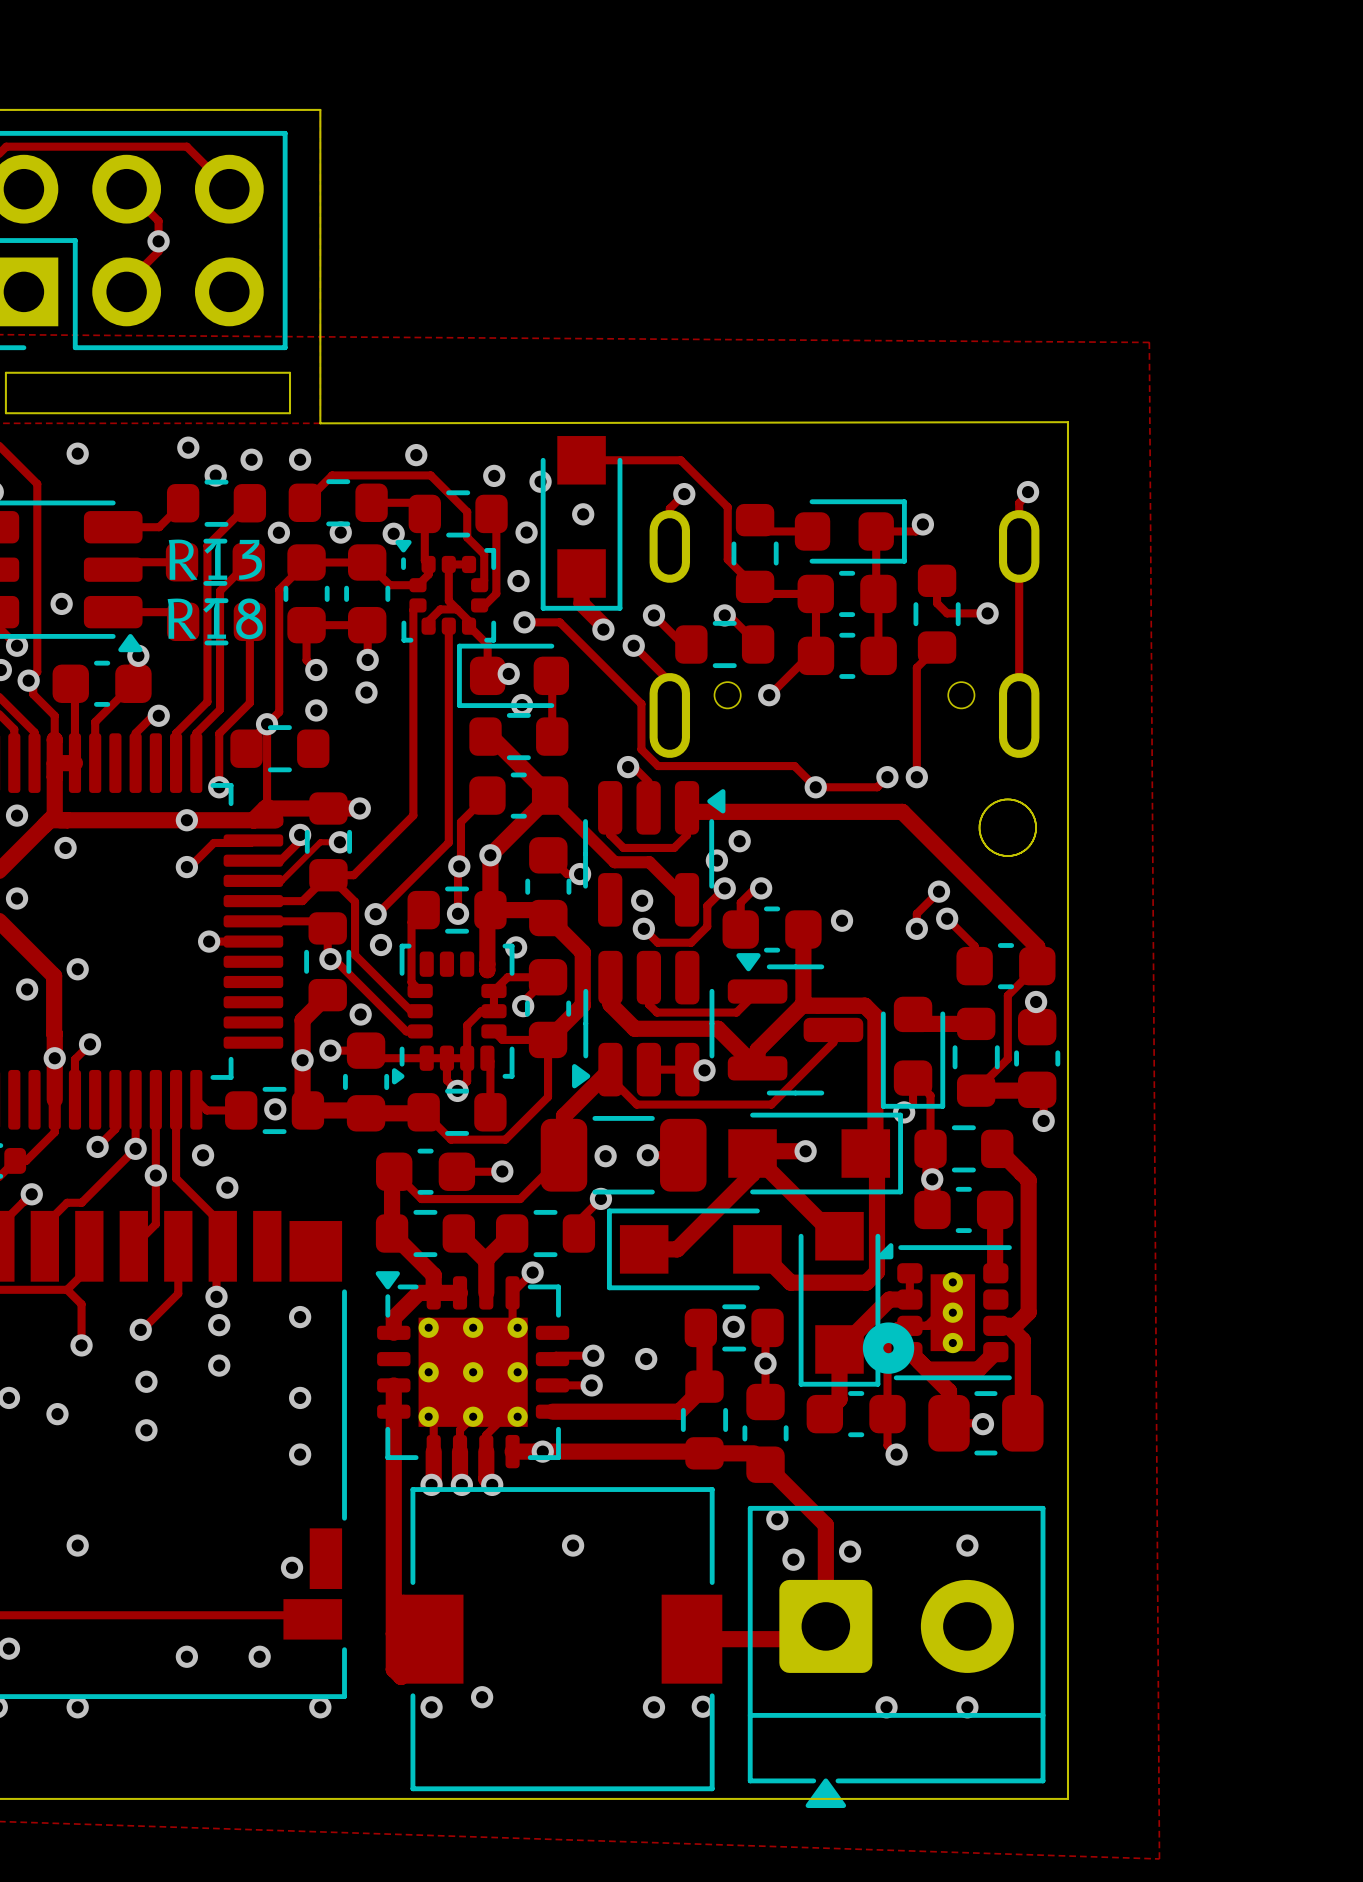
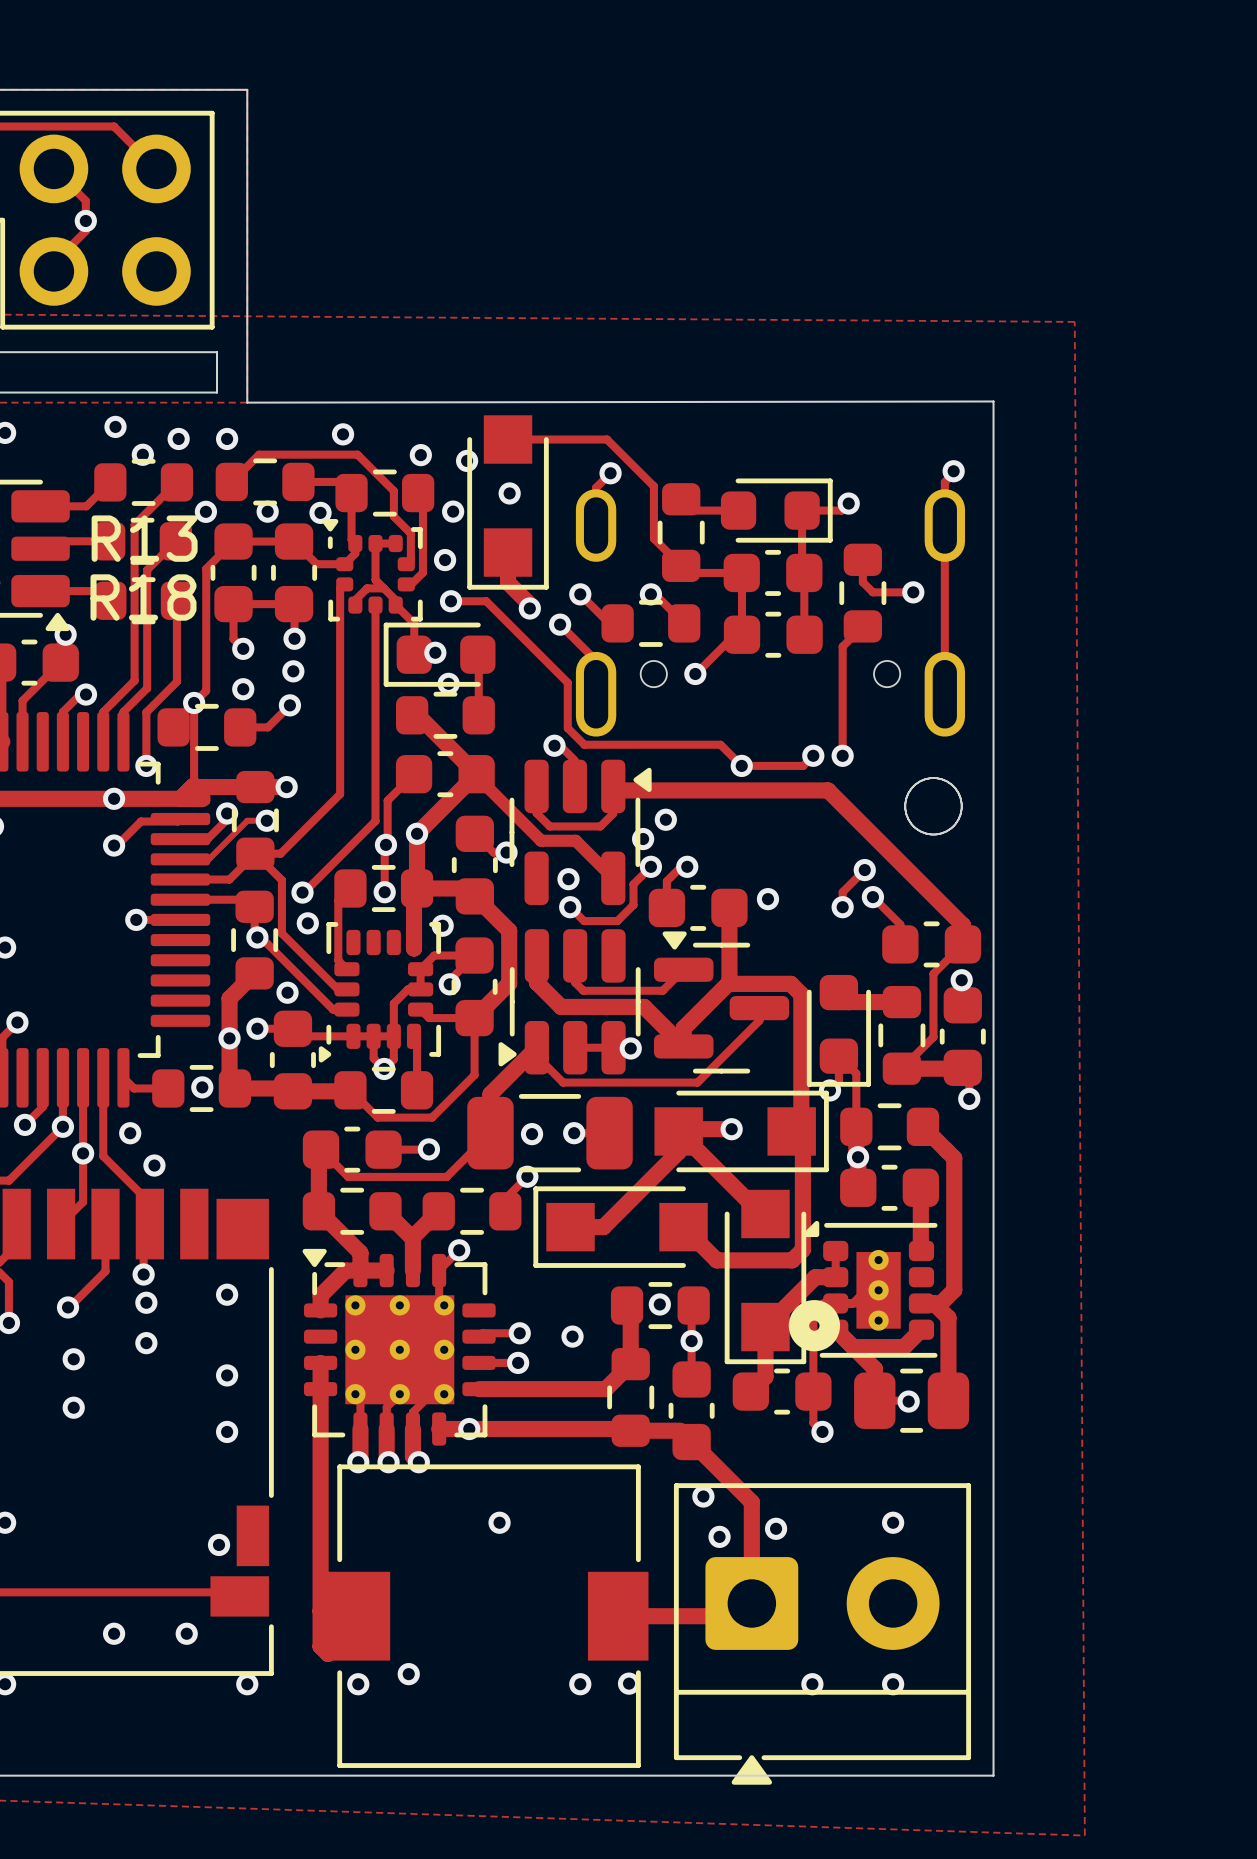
track: none -> (289, 705) (267, 727) (240, 727)
via: none -> (289, 705)

